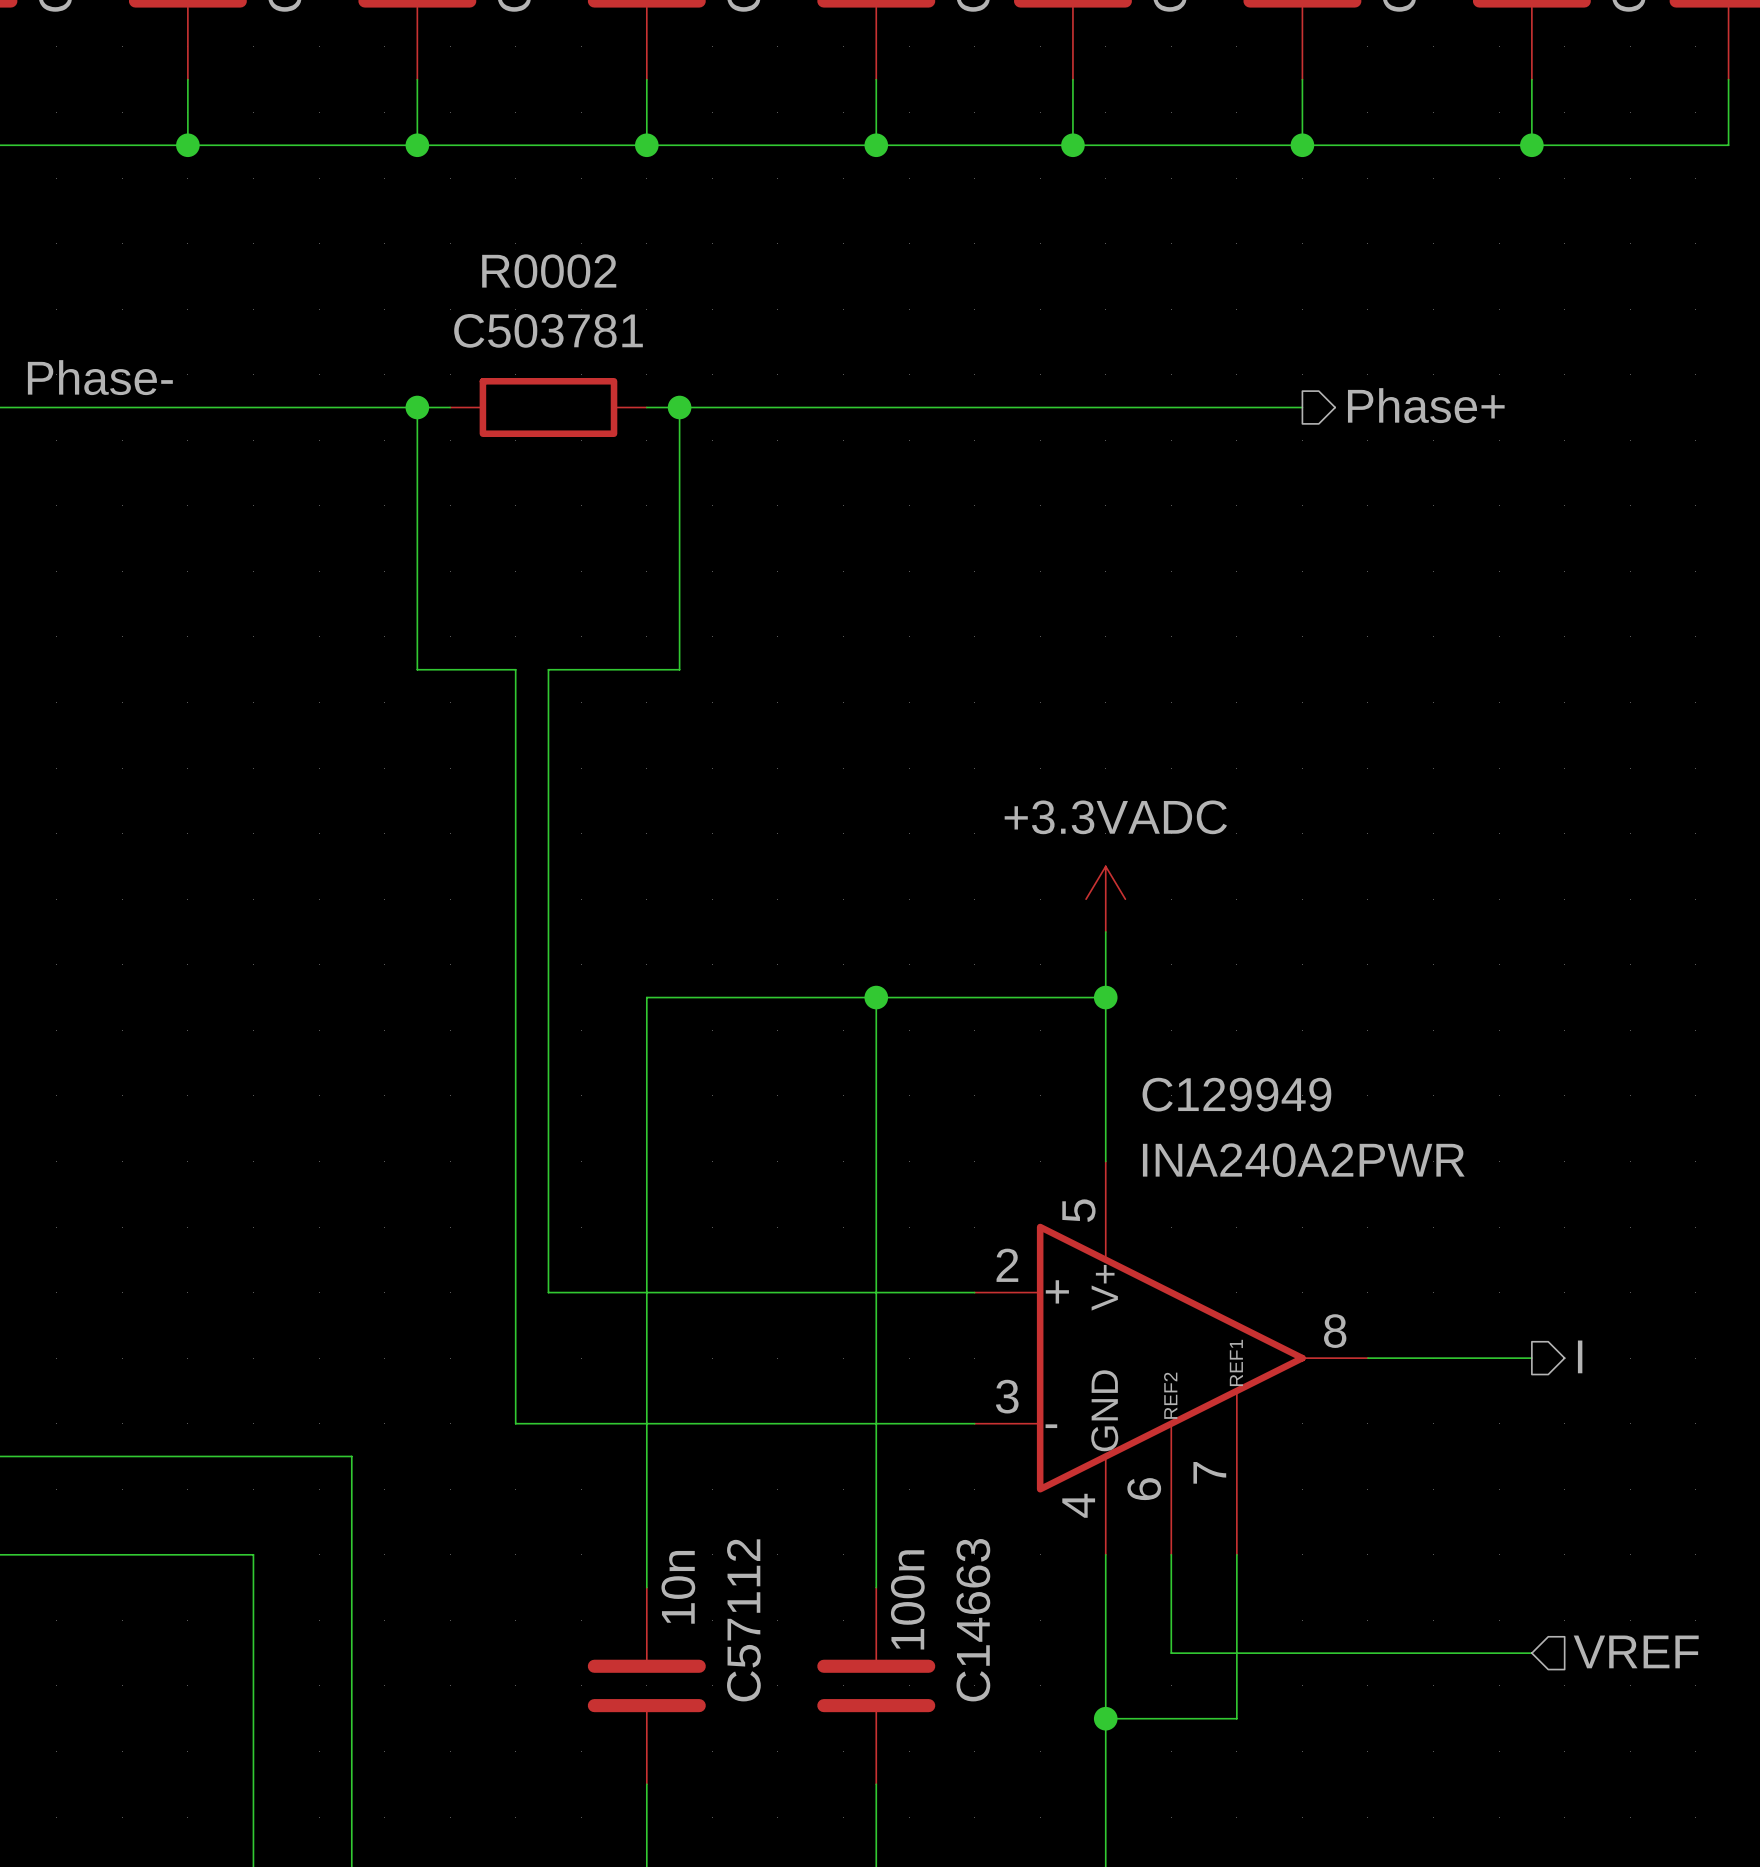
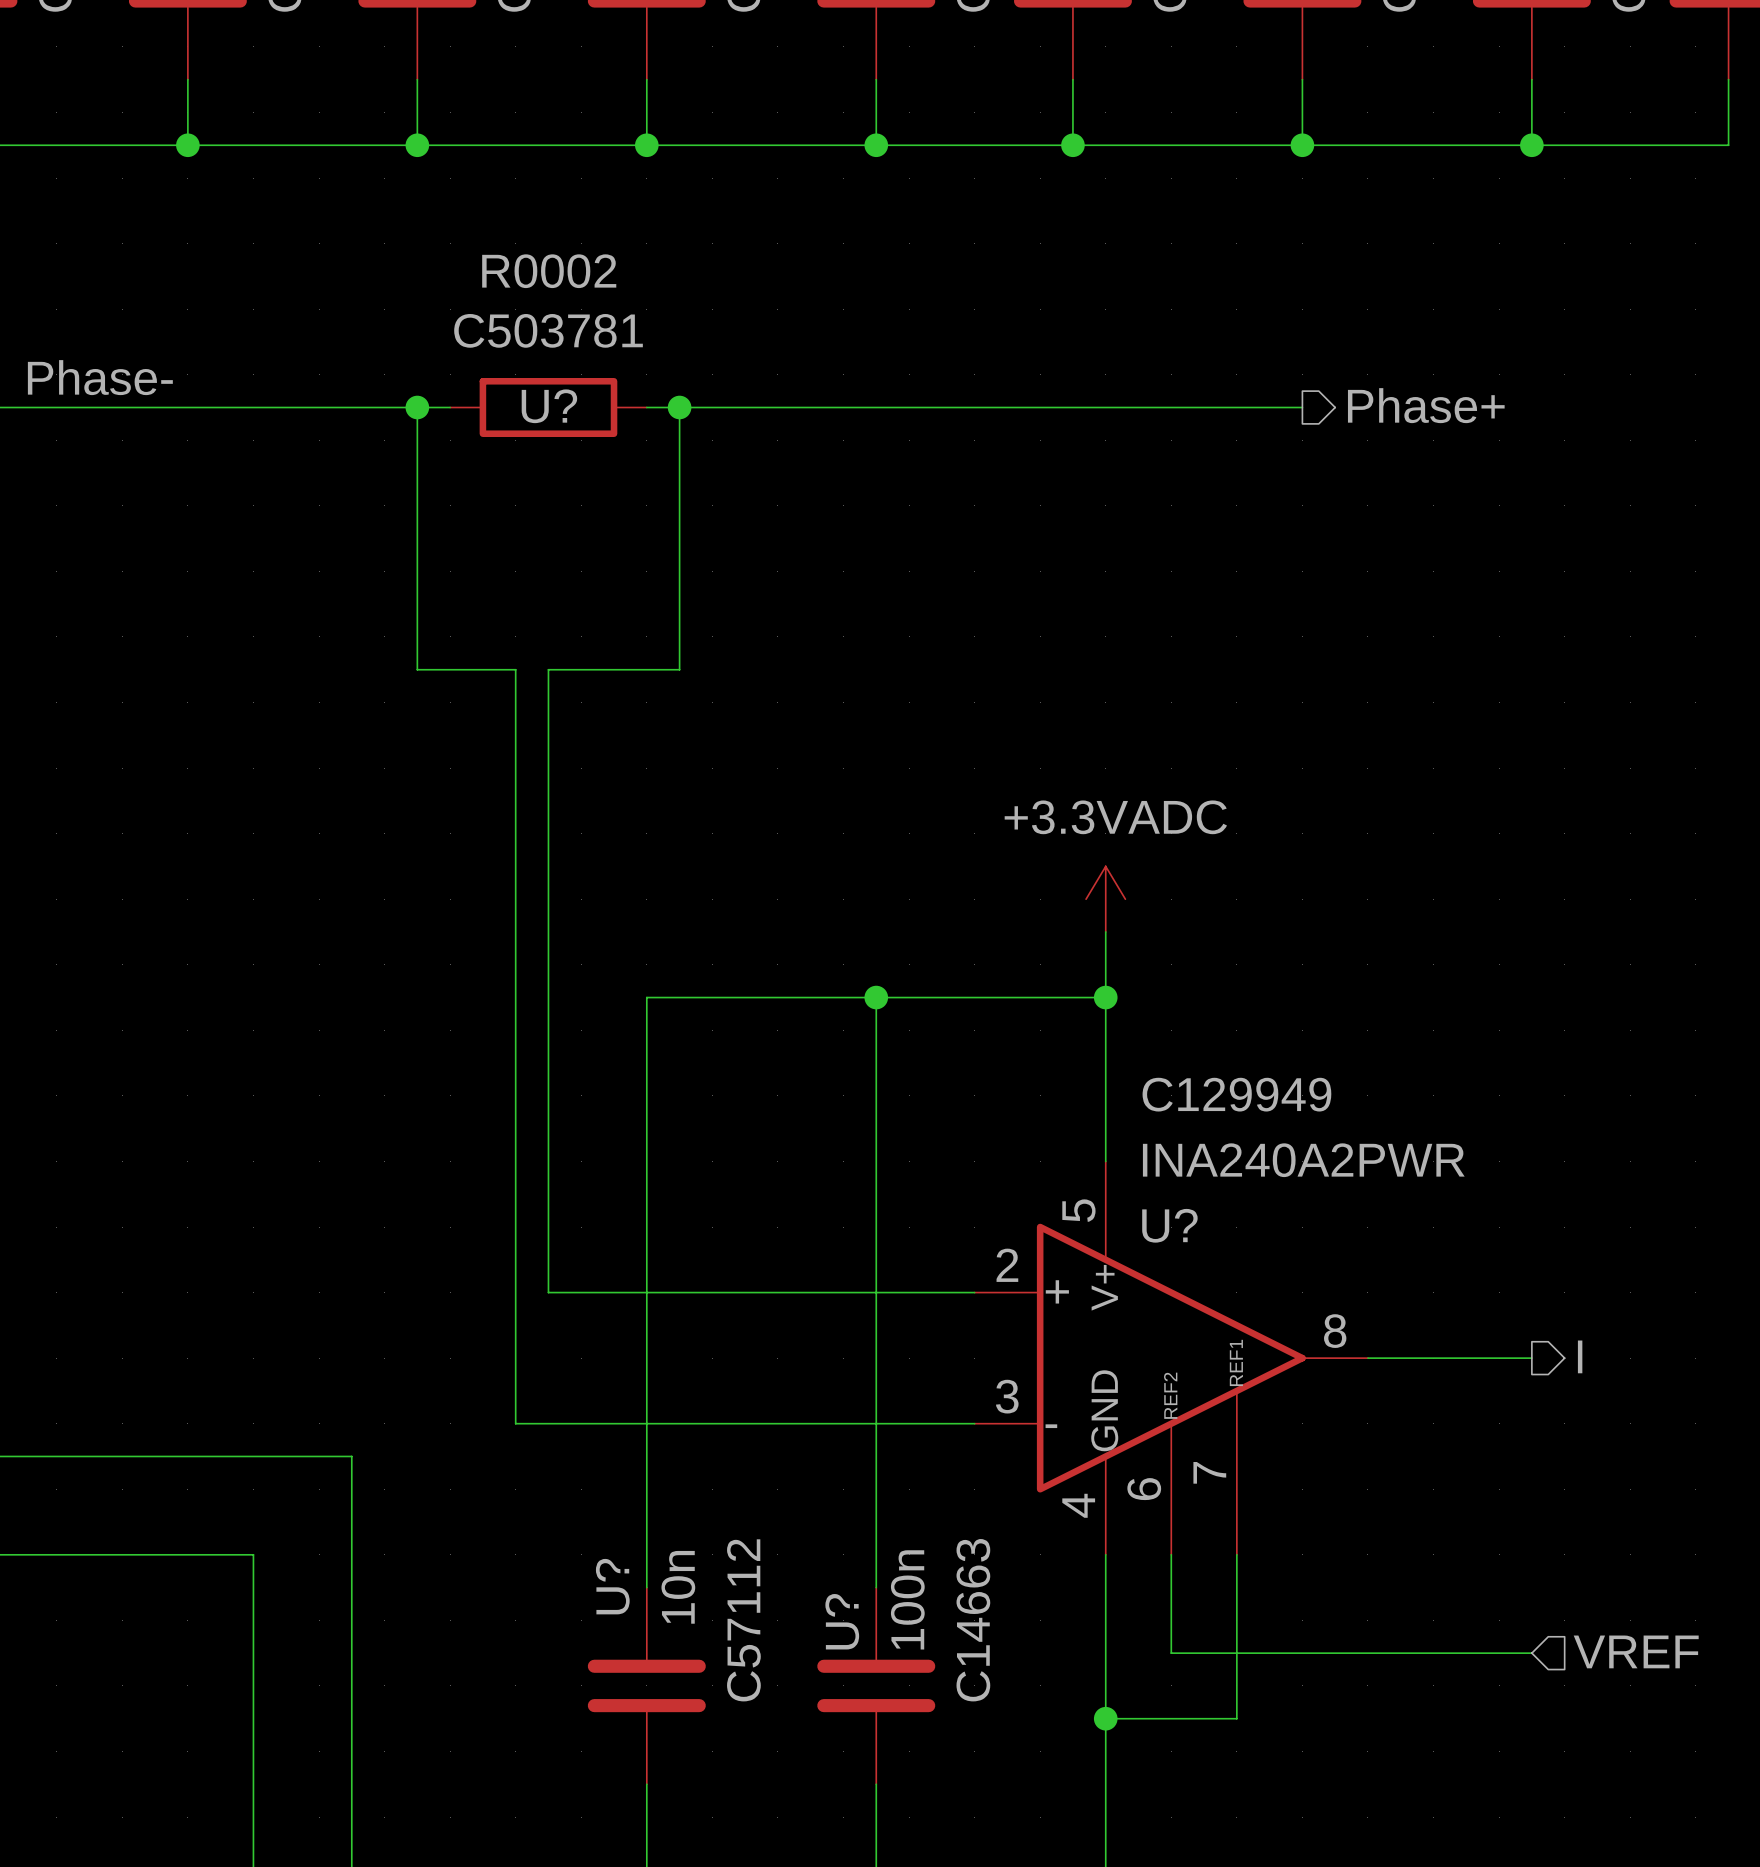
U? name: none -> U? (549, 406)
U? name: none -> U? (1169, 1225)
U? name: none -> U? (612, 1586)
U? name: none -> U? (842, 1621)

